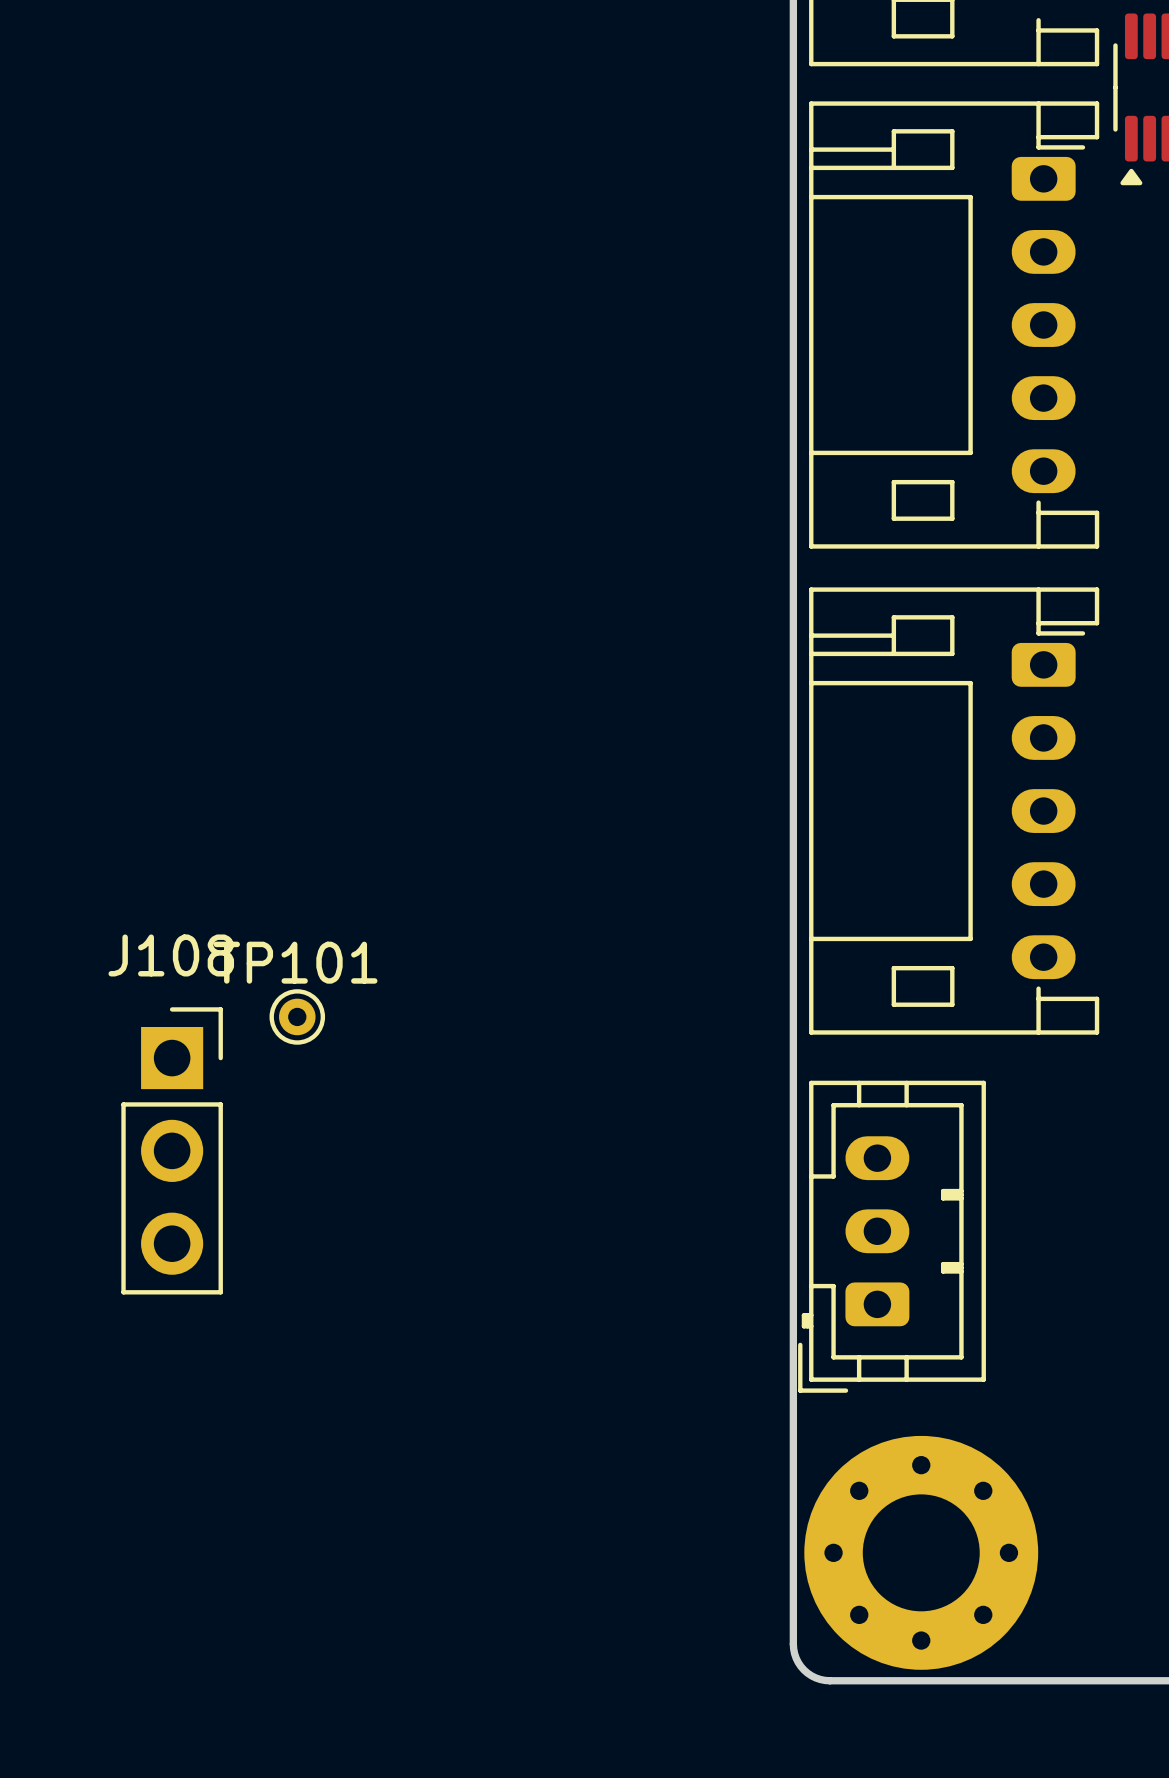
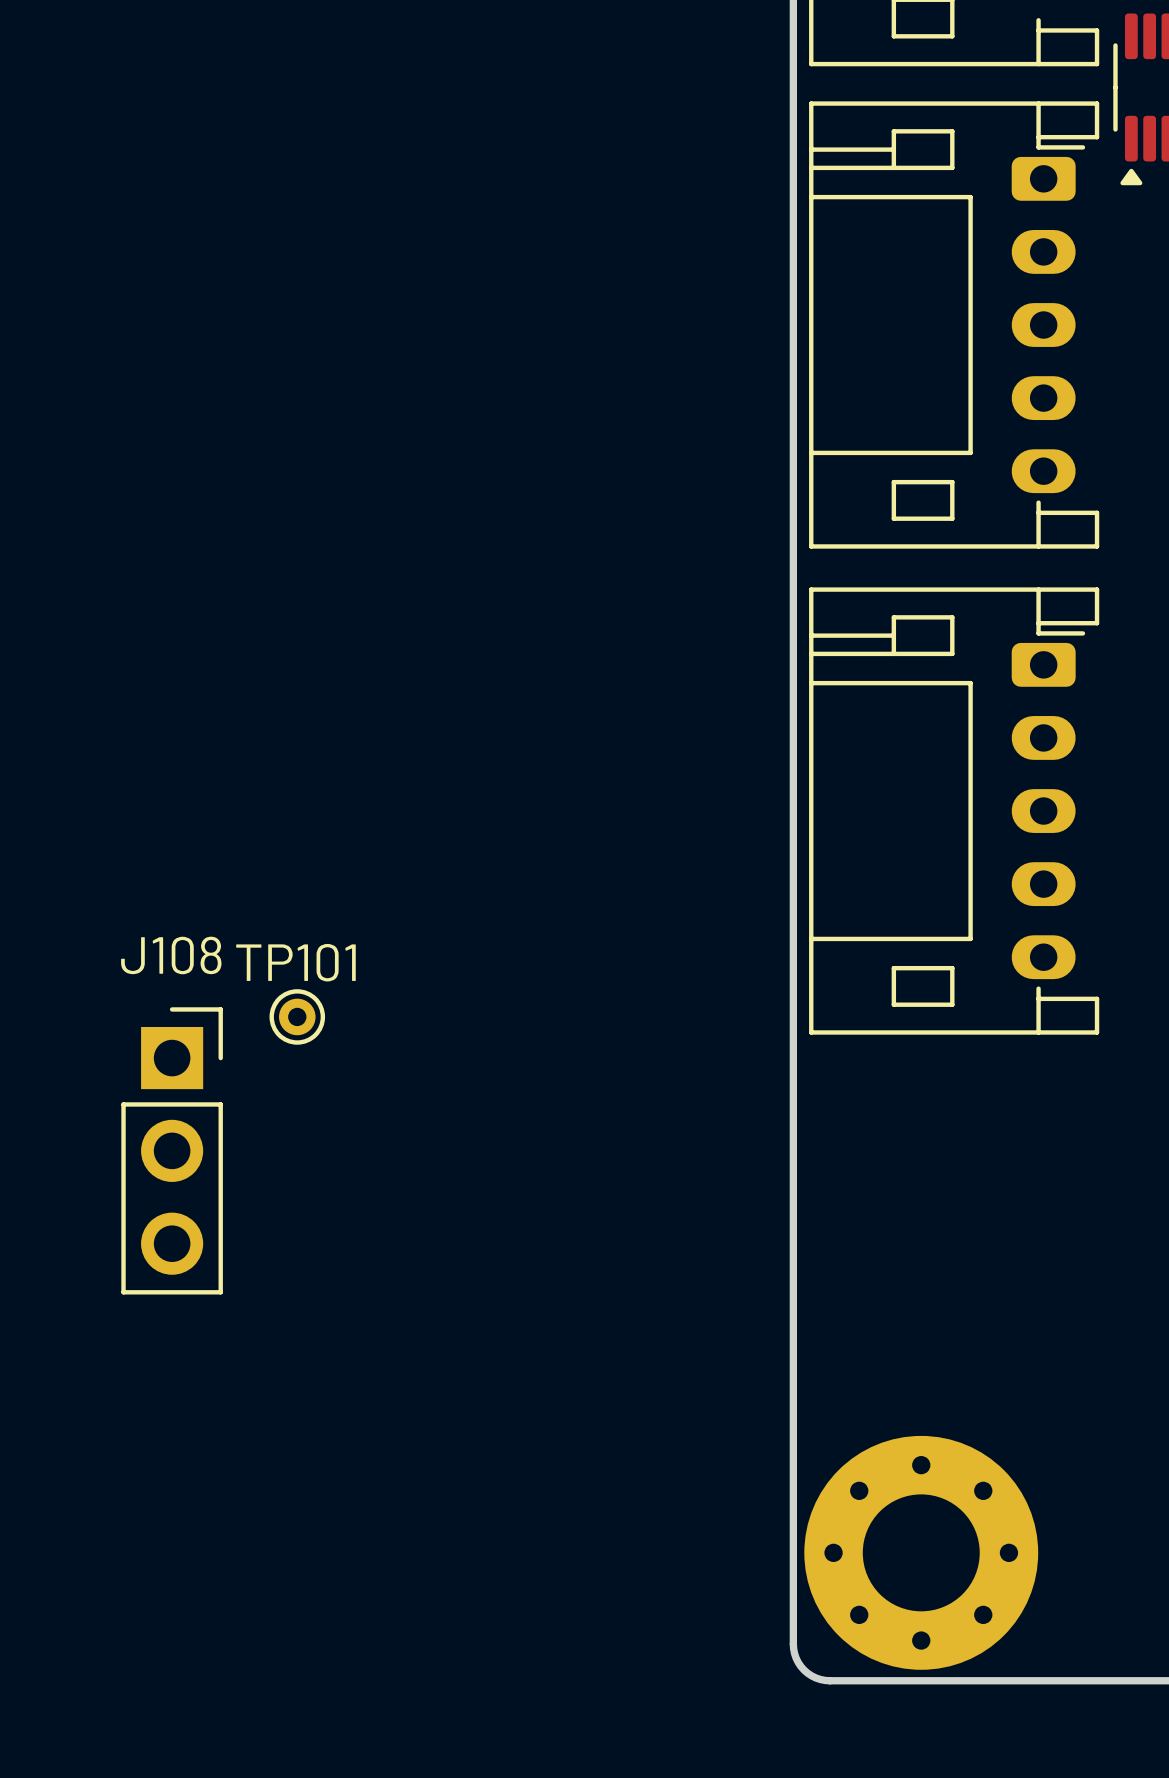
part: (892, 1236) -> none

